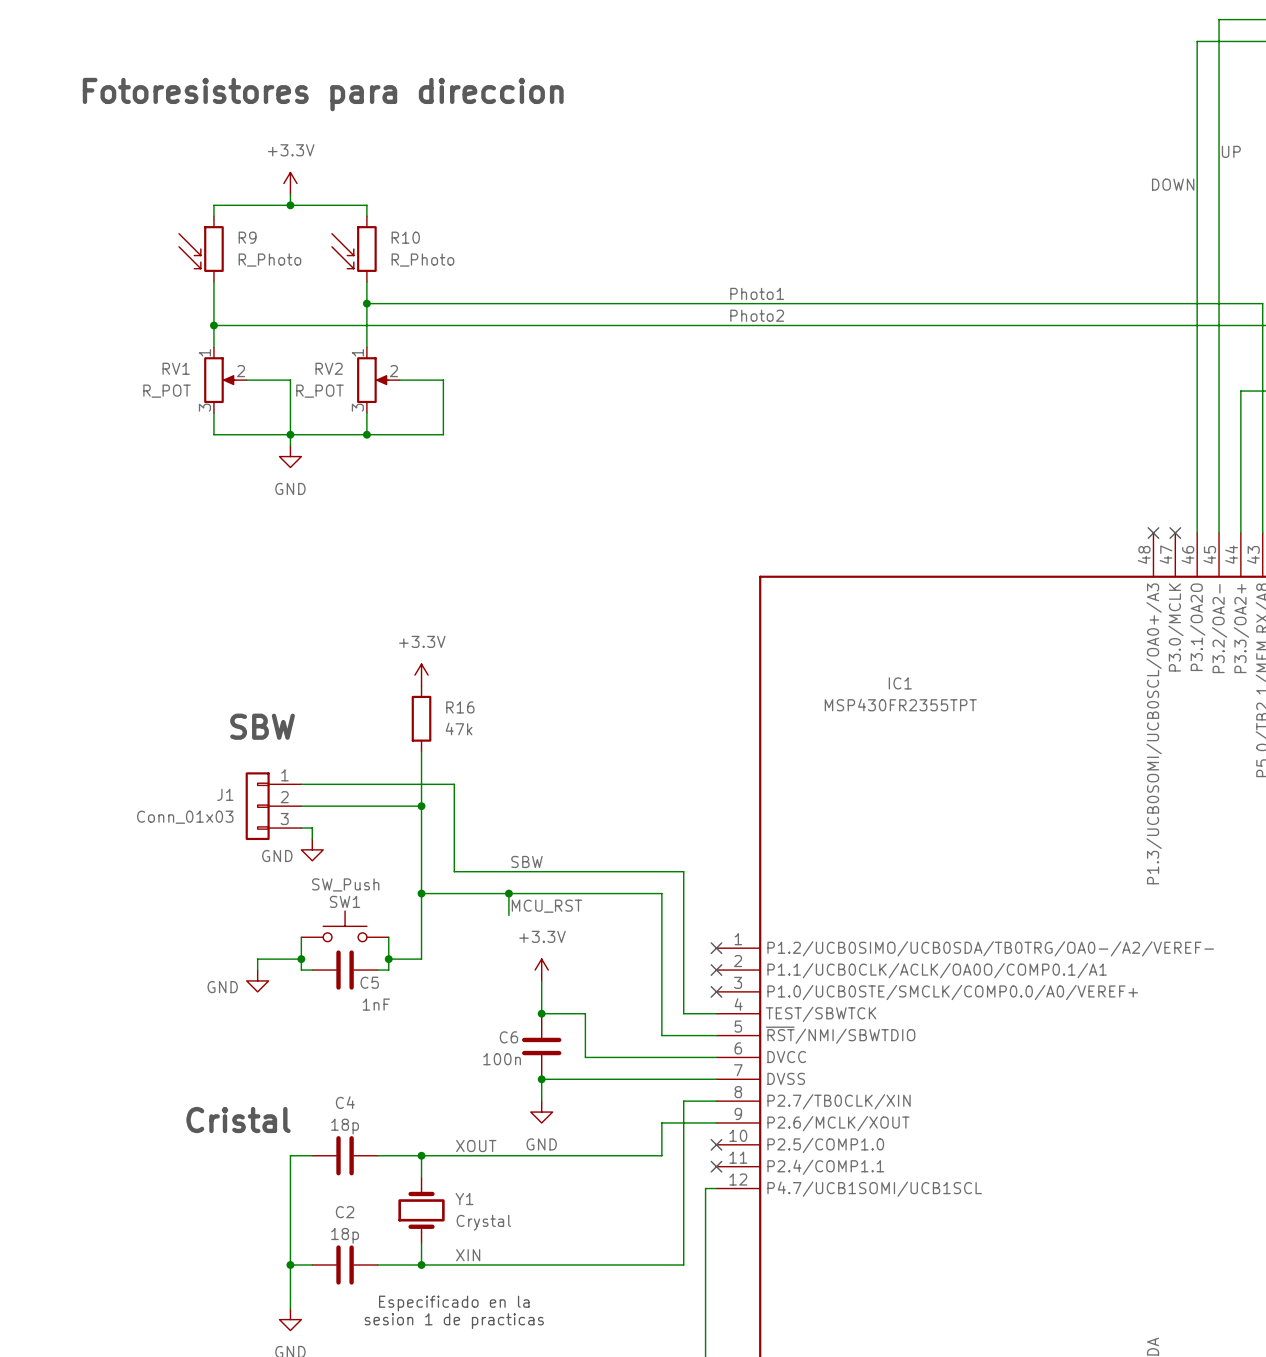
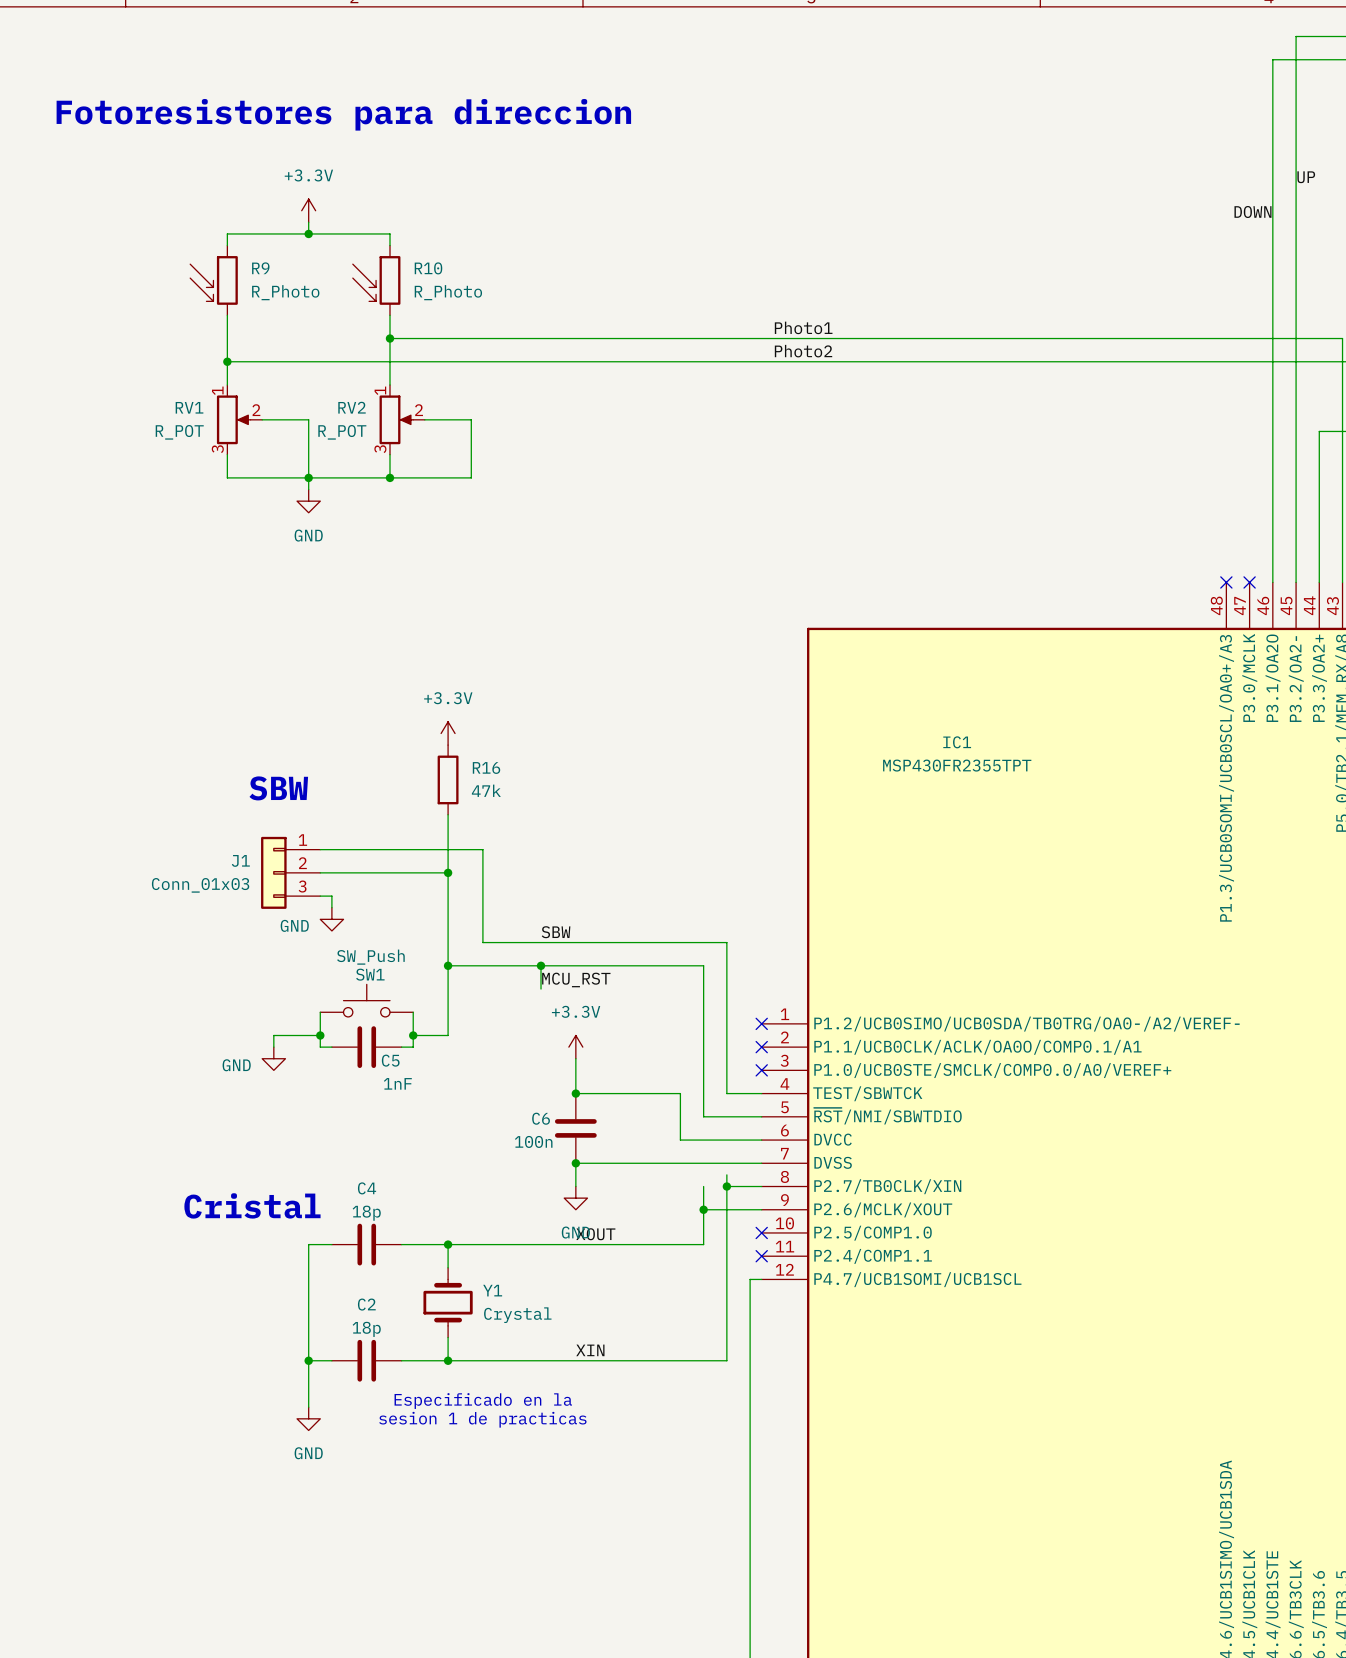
wire: (585, 1013) (585, 1057) (640, 1057) -> (622, 1093) (680, 1093) (680, 1140)
wire: none -> (726, 1174) (726, 1186)
wire: none -> (703, 1186) (703, 1209)
junction: none -> (726, 1186)
junction: none -> (703, 1209)
label position: XOUT (476, 1146) -> XOUT (595, 1234)
label position: XIN (468, 1255) -> XIN (590, 1350)

